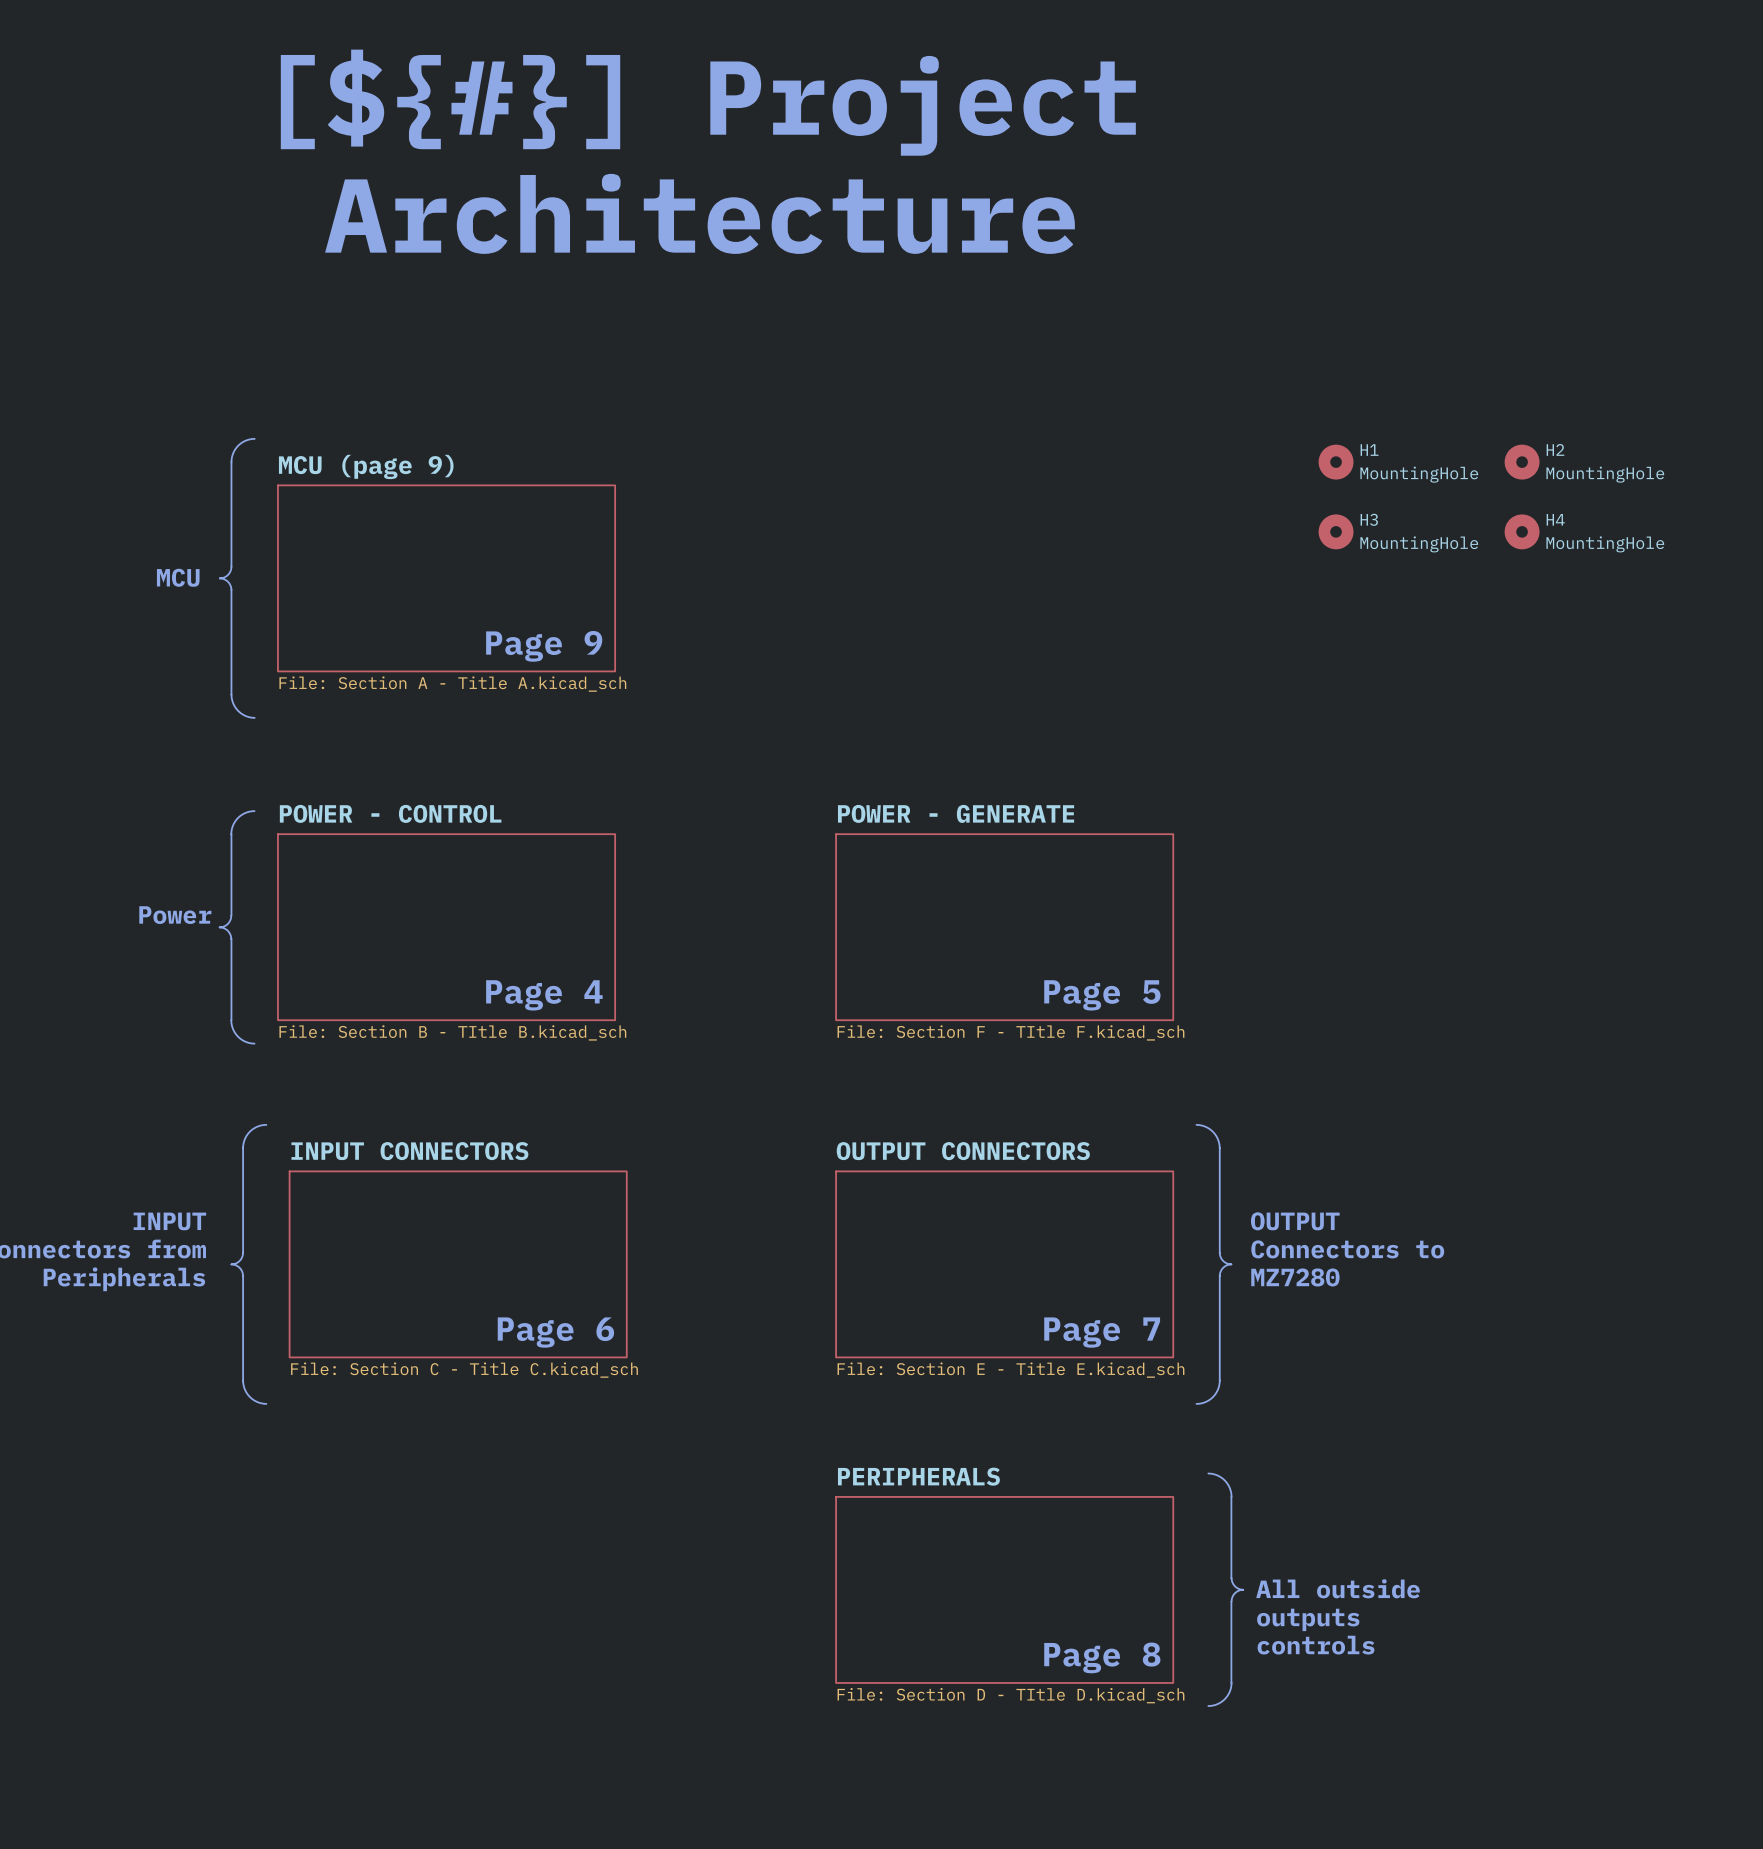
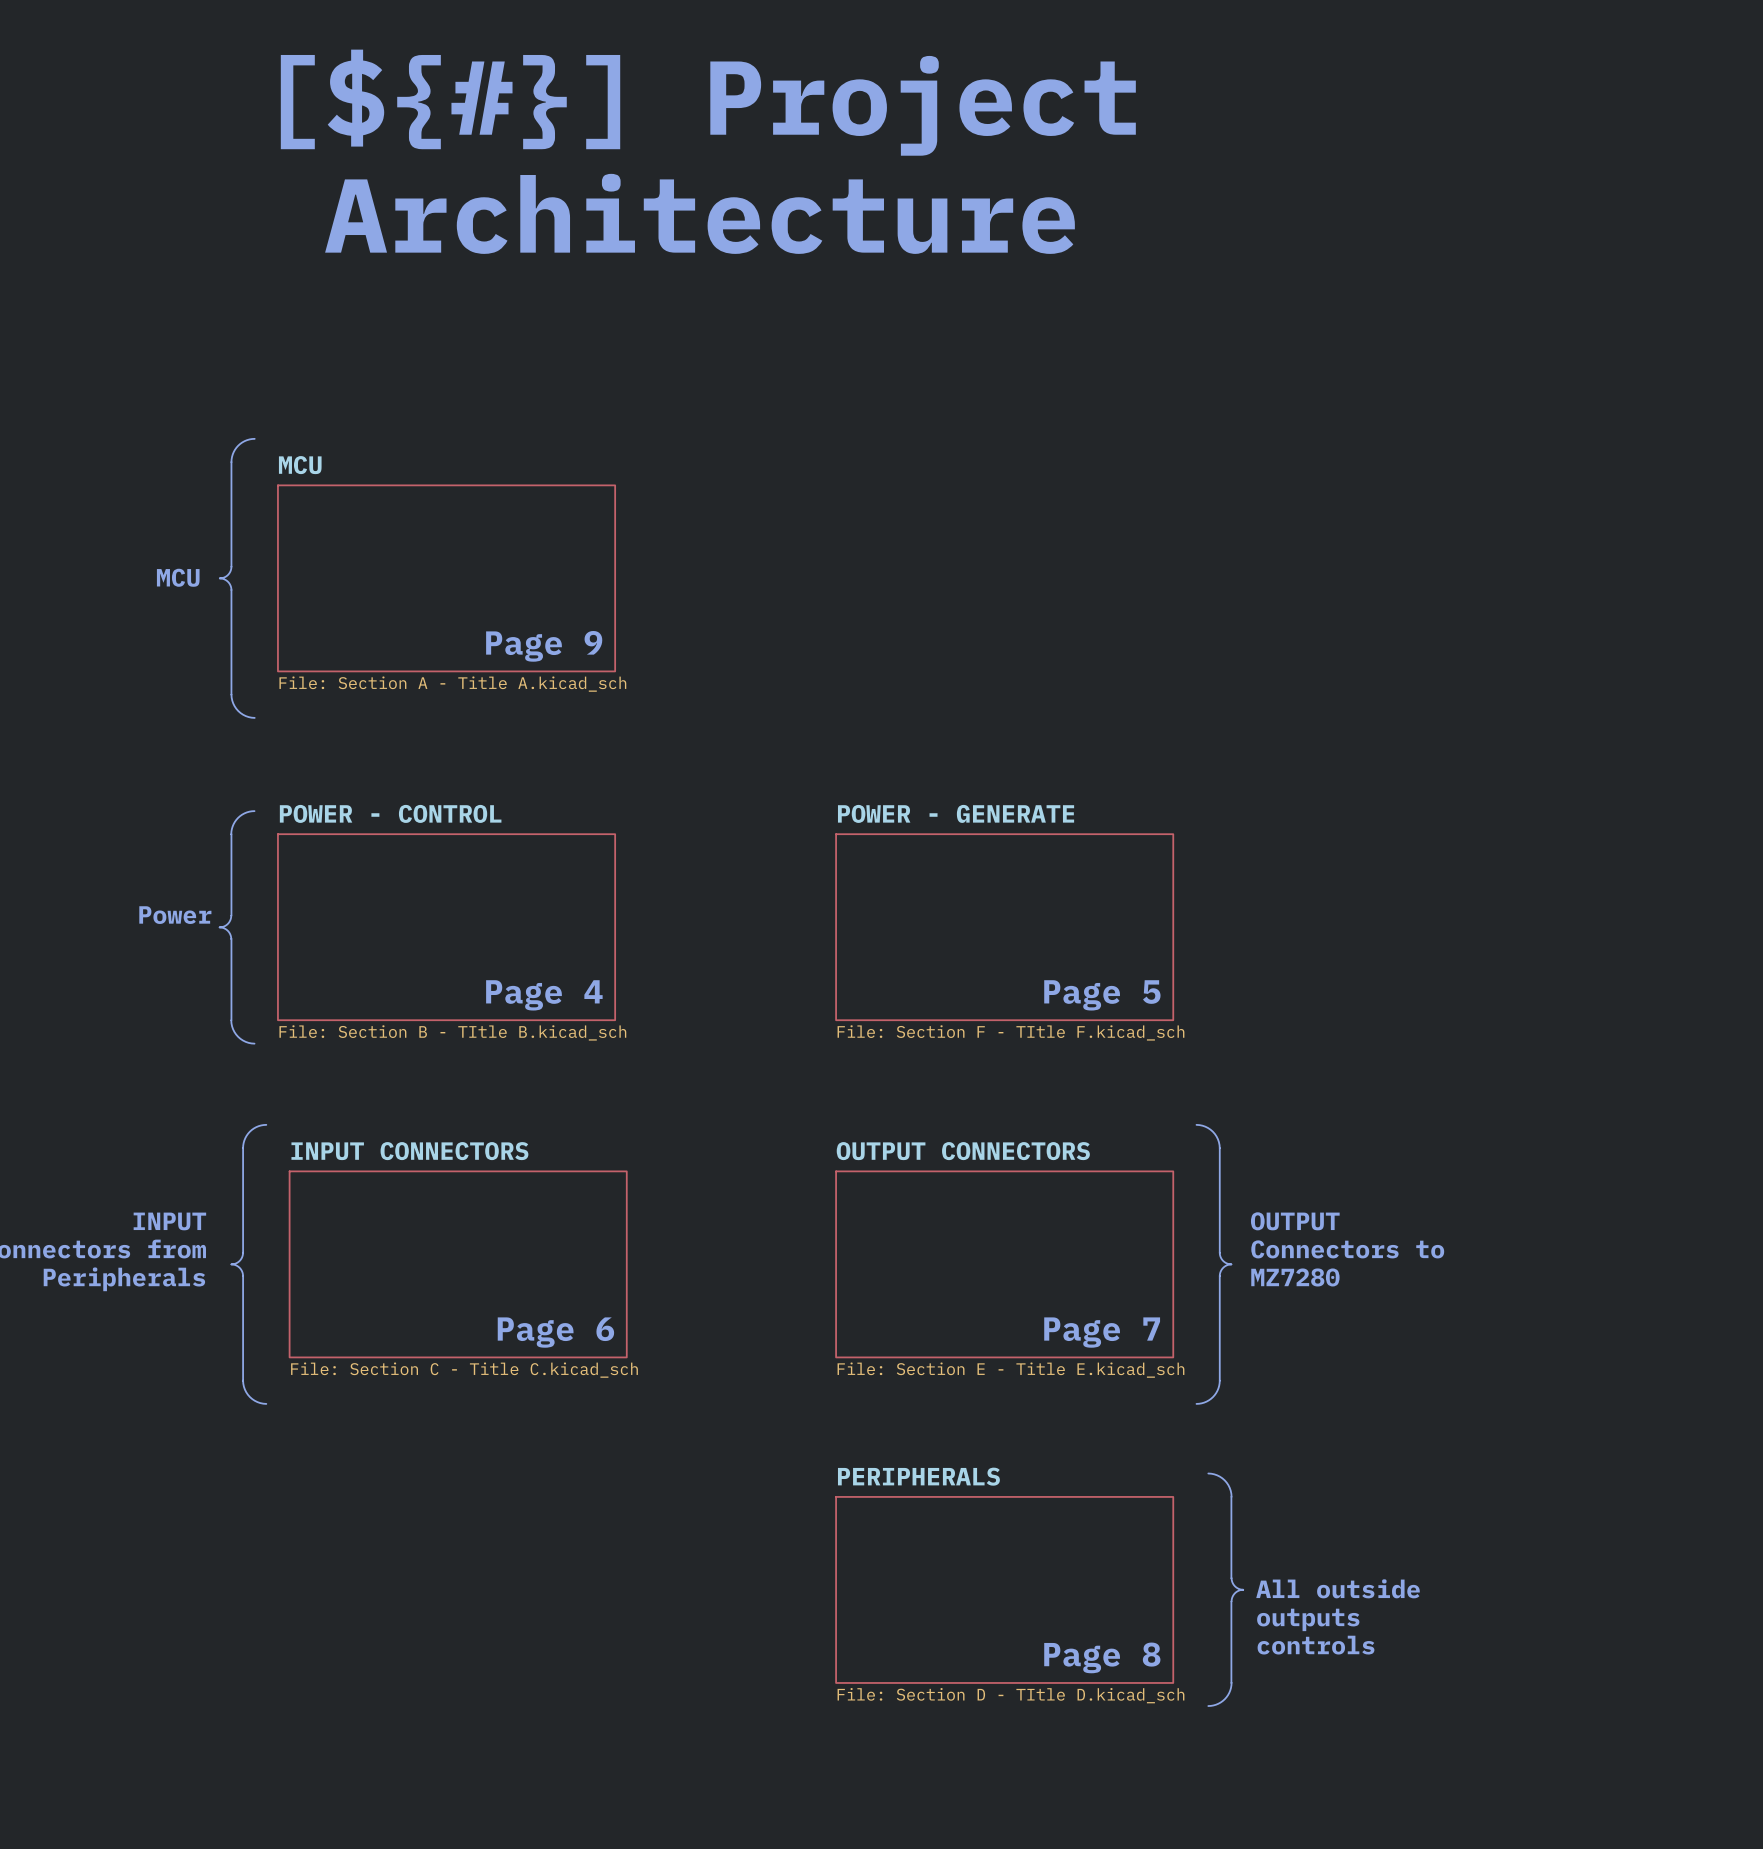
H1: MountingHole (1336, 462) -> none
H2: MountingHole (1522, 462) -> none
sheet MCU (page 9) name: MCU (page 9) (366, 466) -> MCU (300, 465)
H3: MountingHole (1336, 531) -> none
H4: MountingHole (1522, 531) -> none

